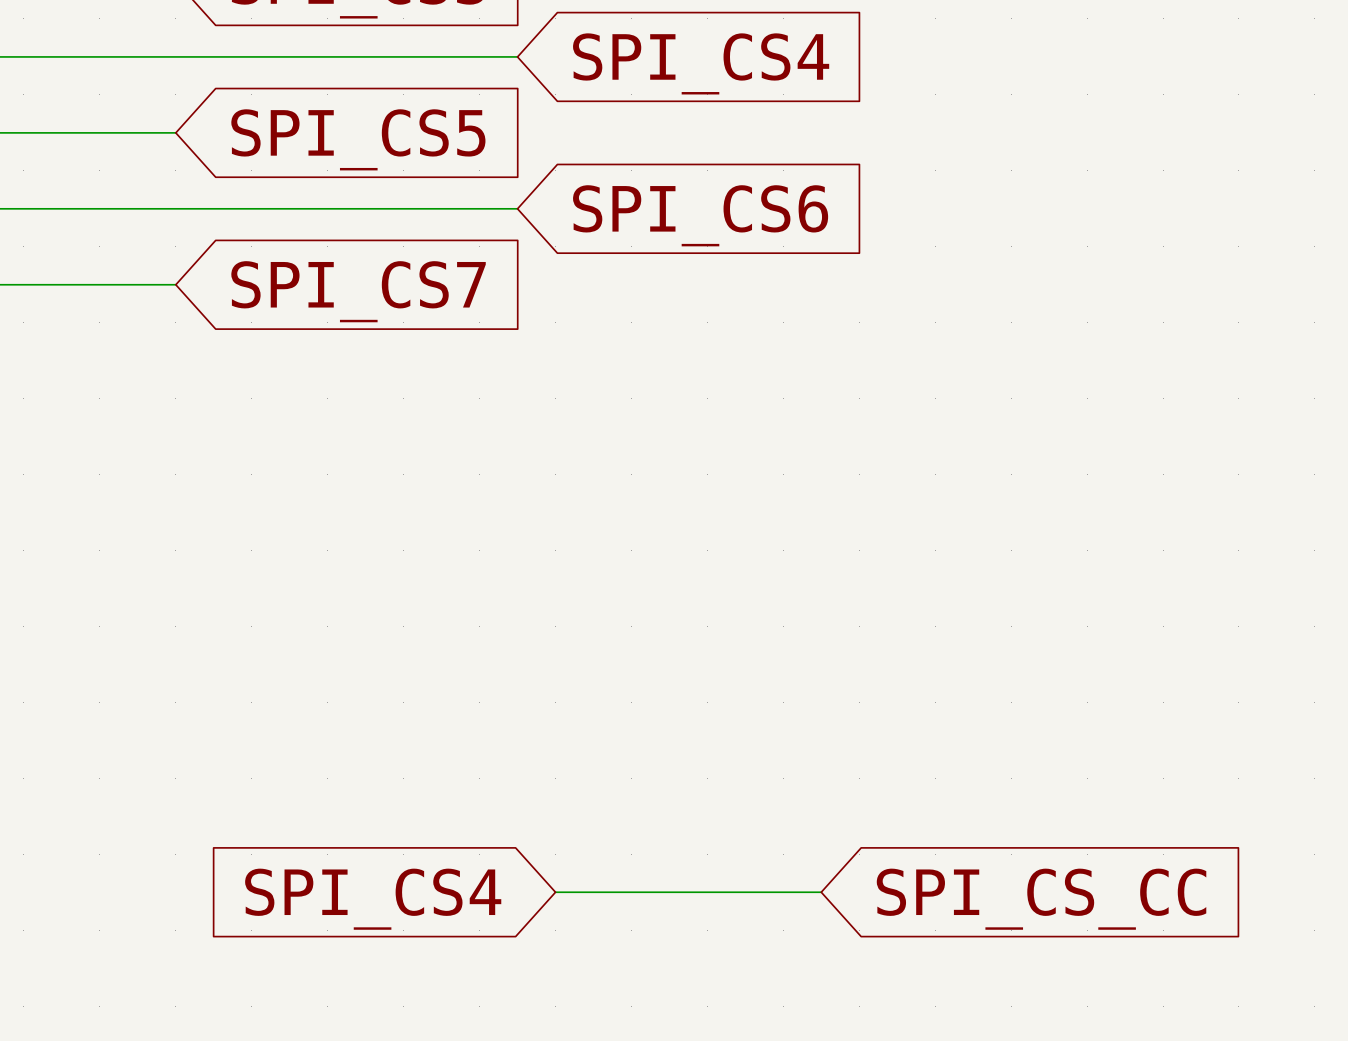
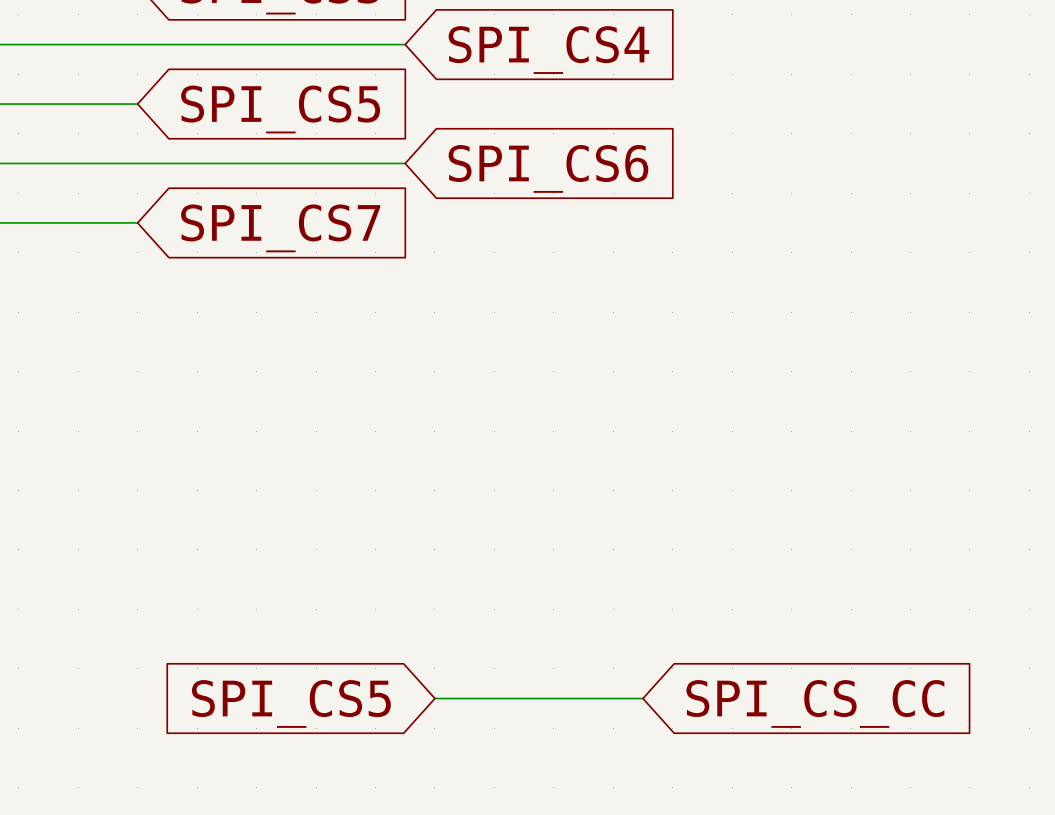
global label: SPI_CS4 (373, 899) -> SPI_CS5 (291, 703)

